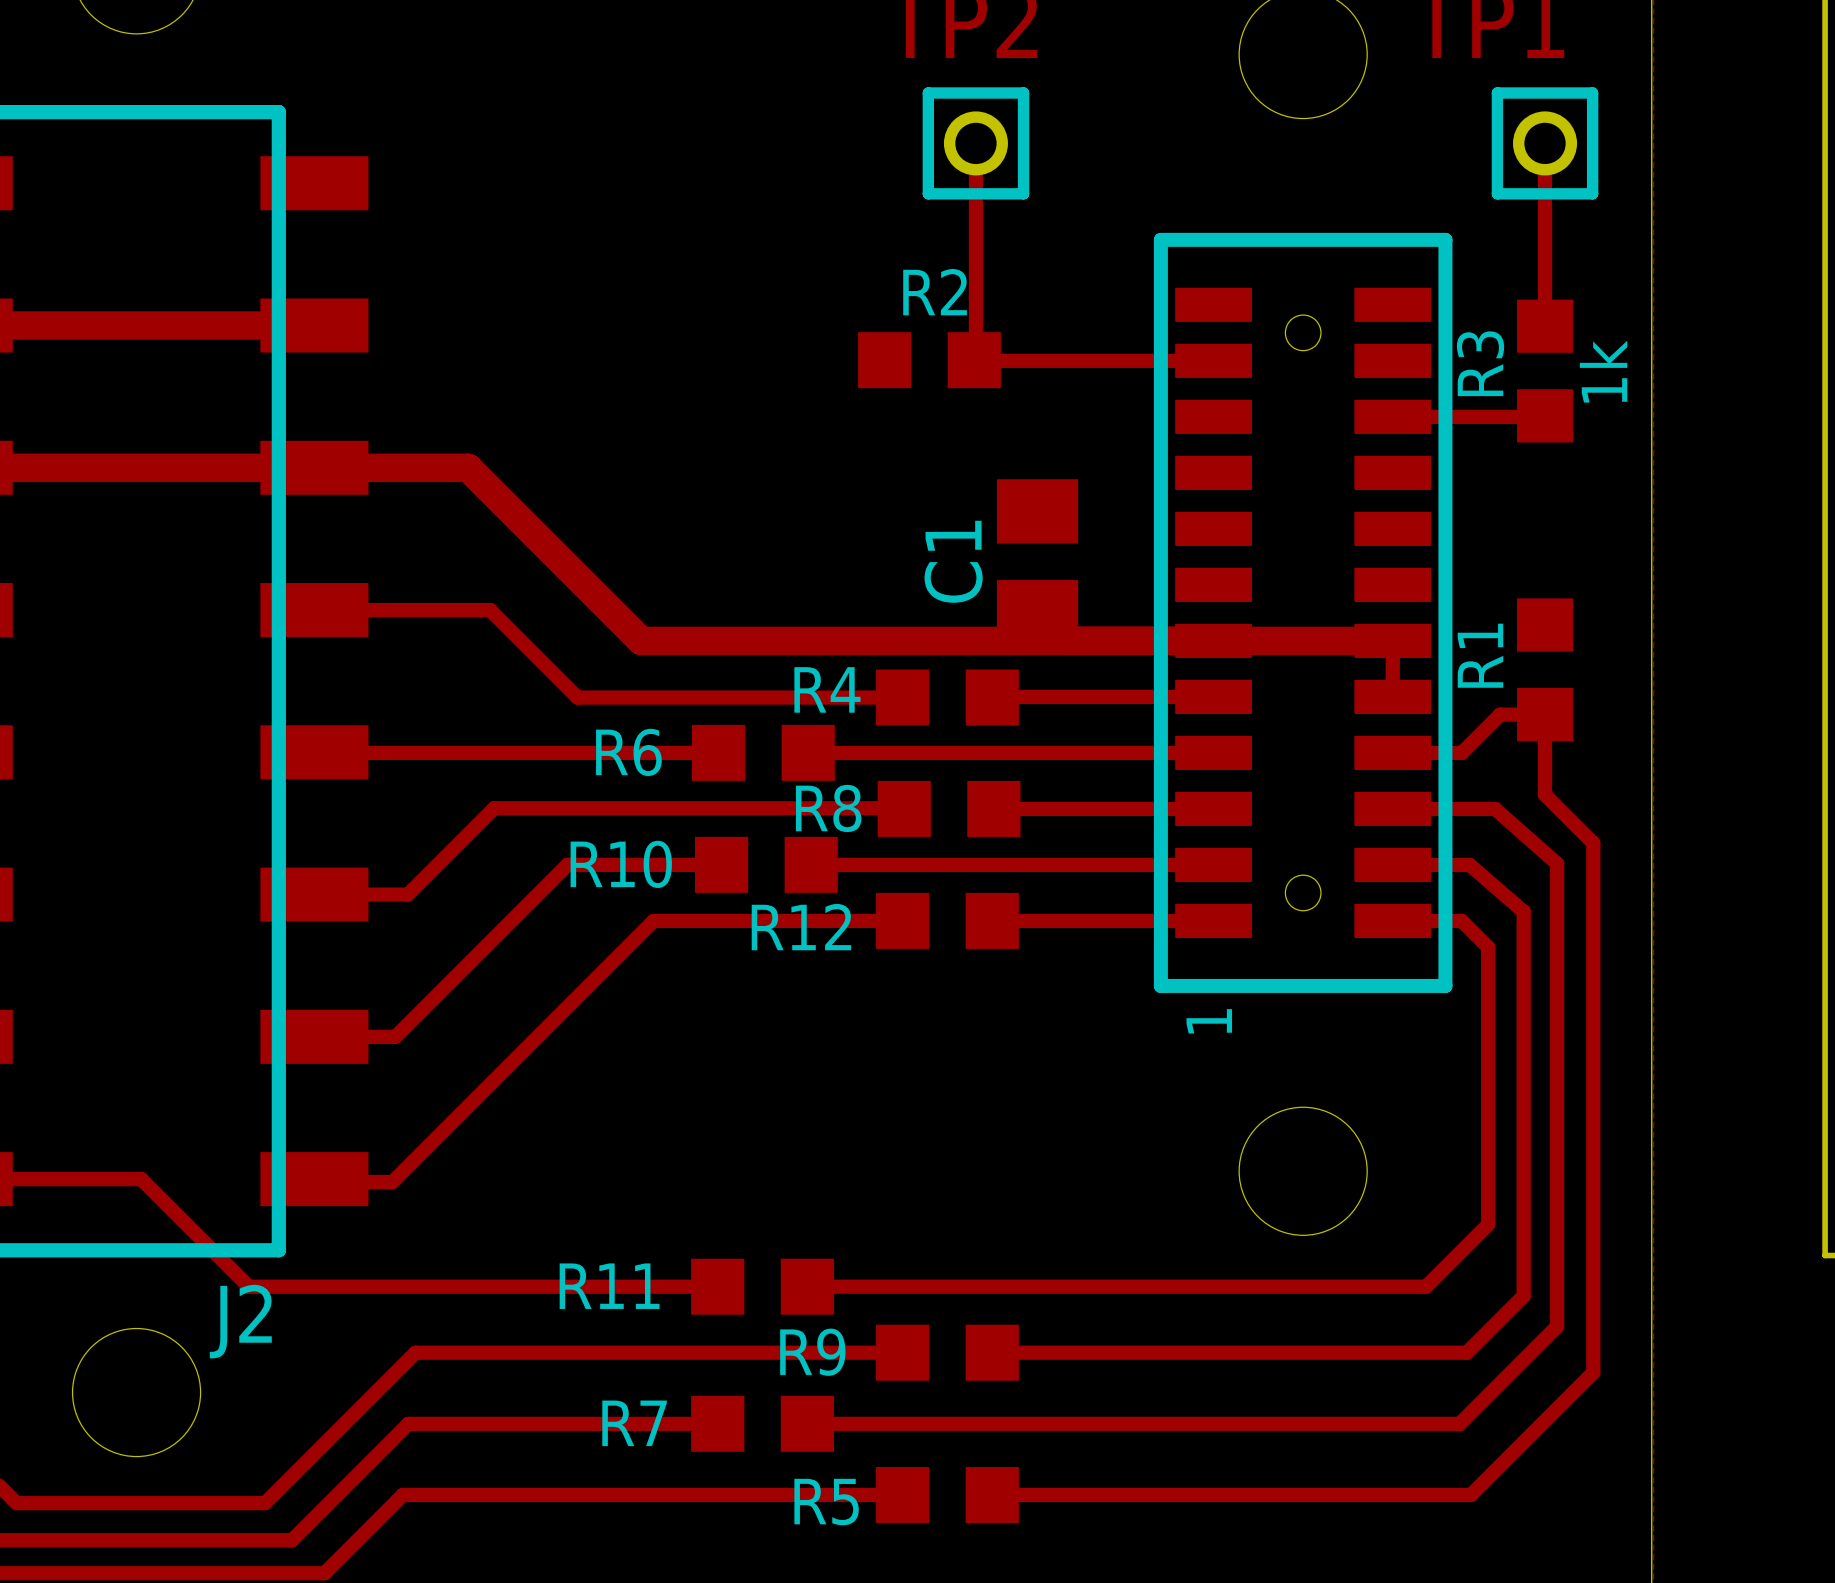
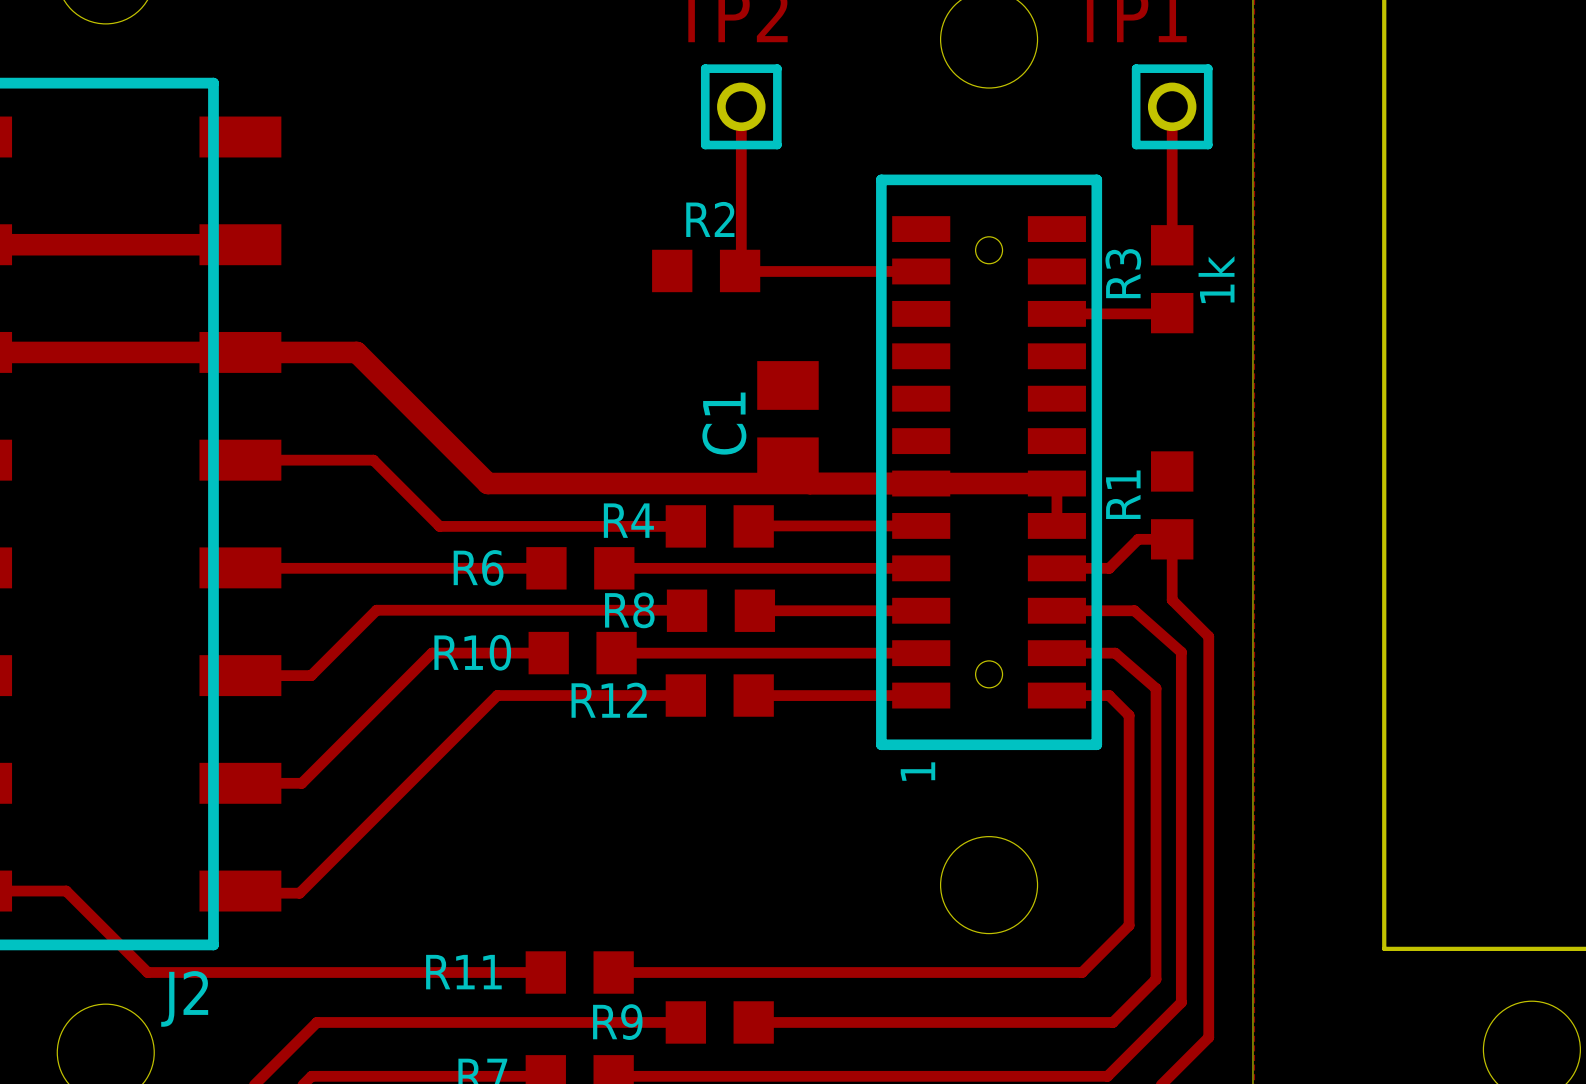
top track: (84, 1179) (141, 1179) (248, 1286) -> (66, 891) (147, 972) (190, 972)

